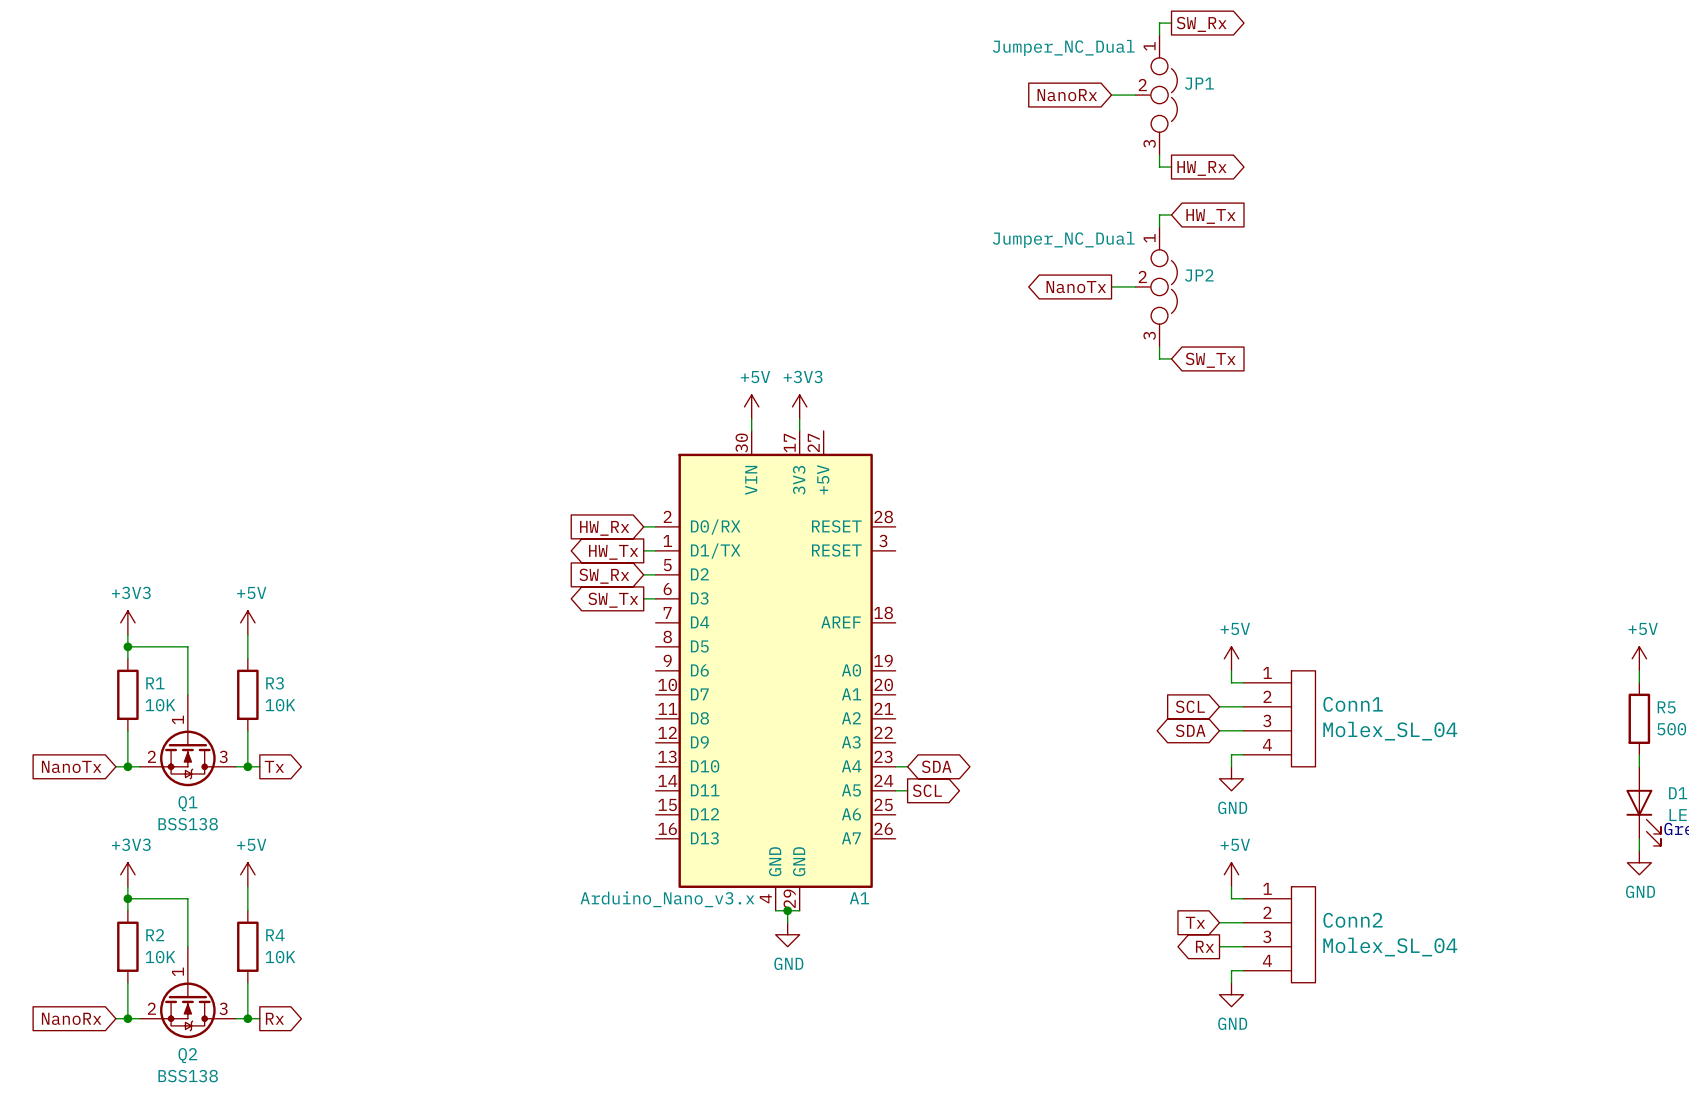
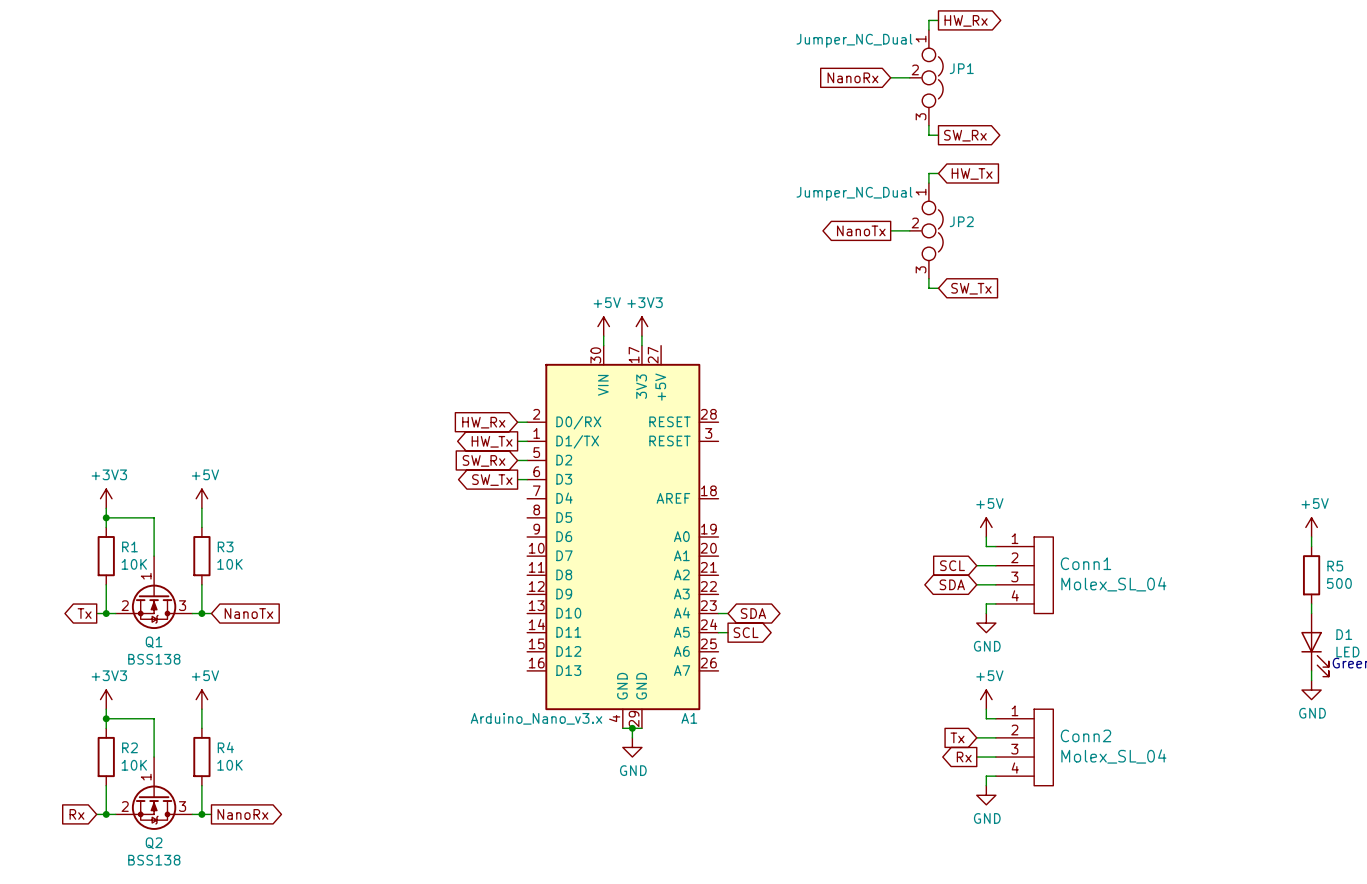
global label: SW_Rx (1201, 24) -> HW_Rx (966, 20)
global label: HW_Rx (1201, 168) -> SW_Rx (965, 135)
global label shape: input (71, 766) -> output (84, 613)
global label: NanoTx (71, 766) -> Tx (84, 613)
global label shape: output (274, 766) -> input (248, 613)
global label: Tx (274, 766) -> NanoTx (248, 613)
global label: NanoRx (71, 1018) -> Rx (76, 814)
global label: Rx (274, 1018) -> NanoRx (242, 814)

